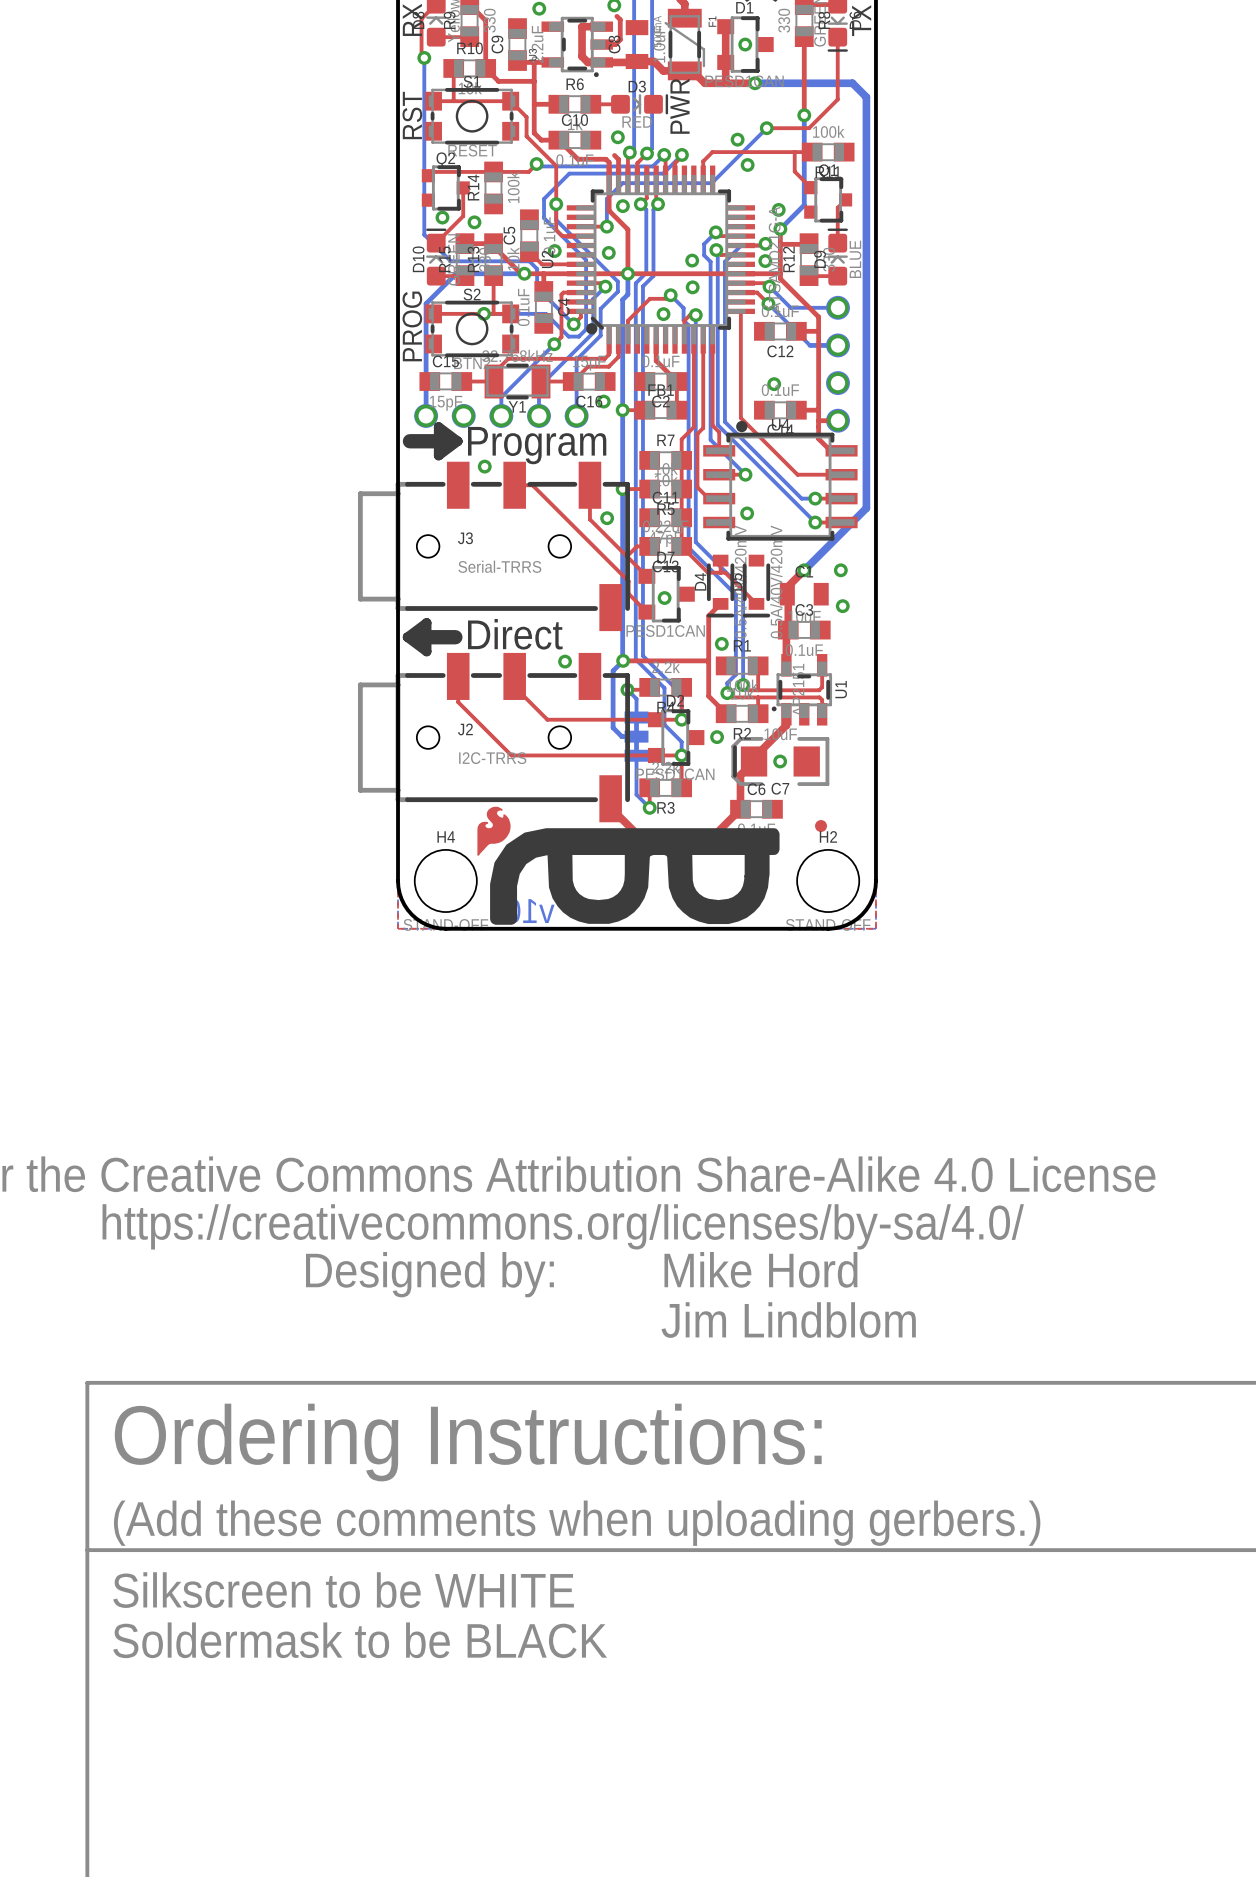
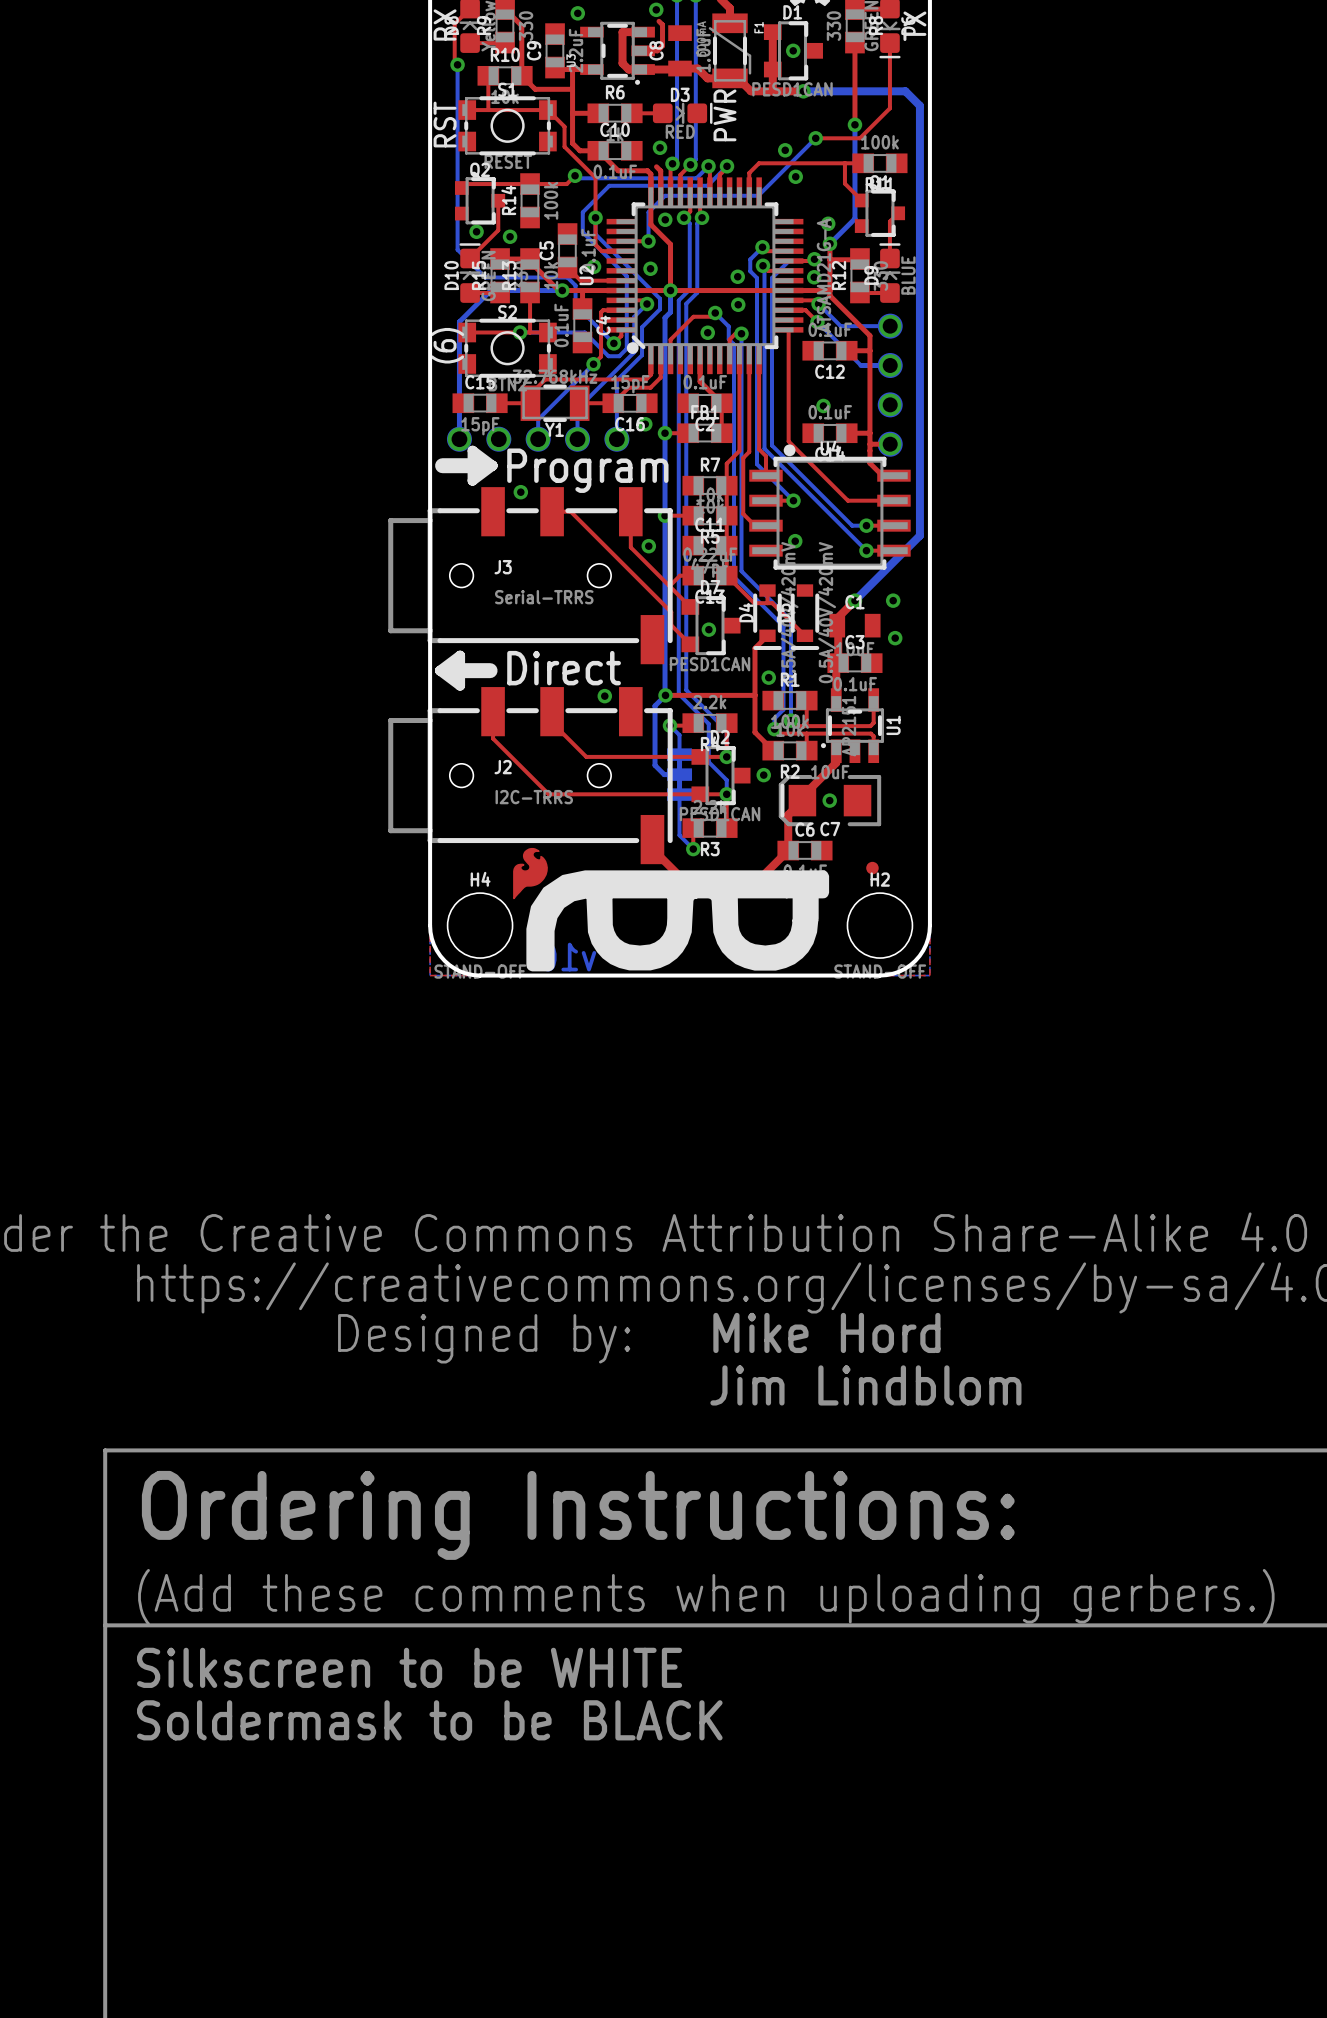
text: PROG (412, 326) -> (6) (447, 345)

